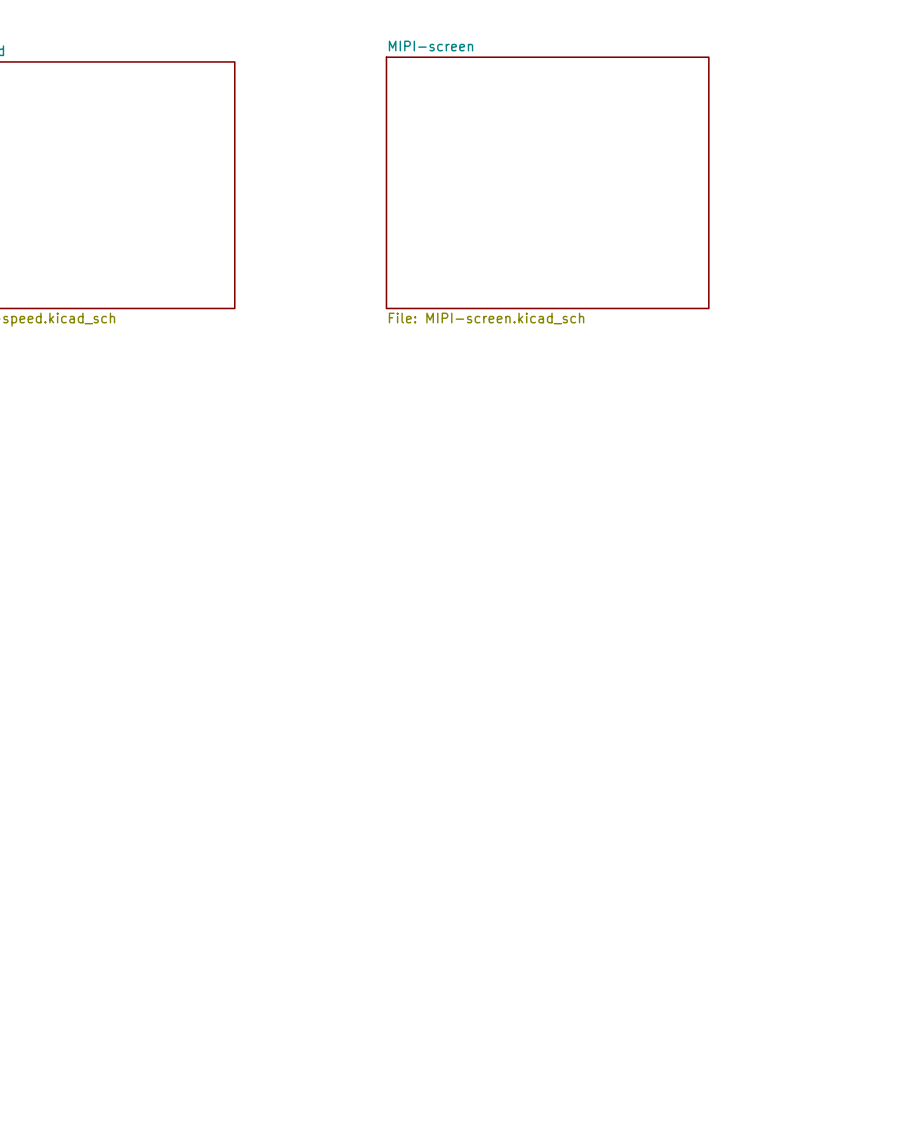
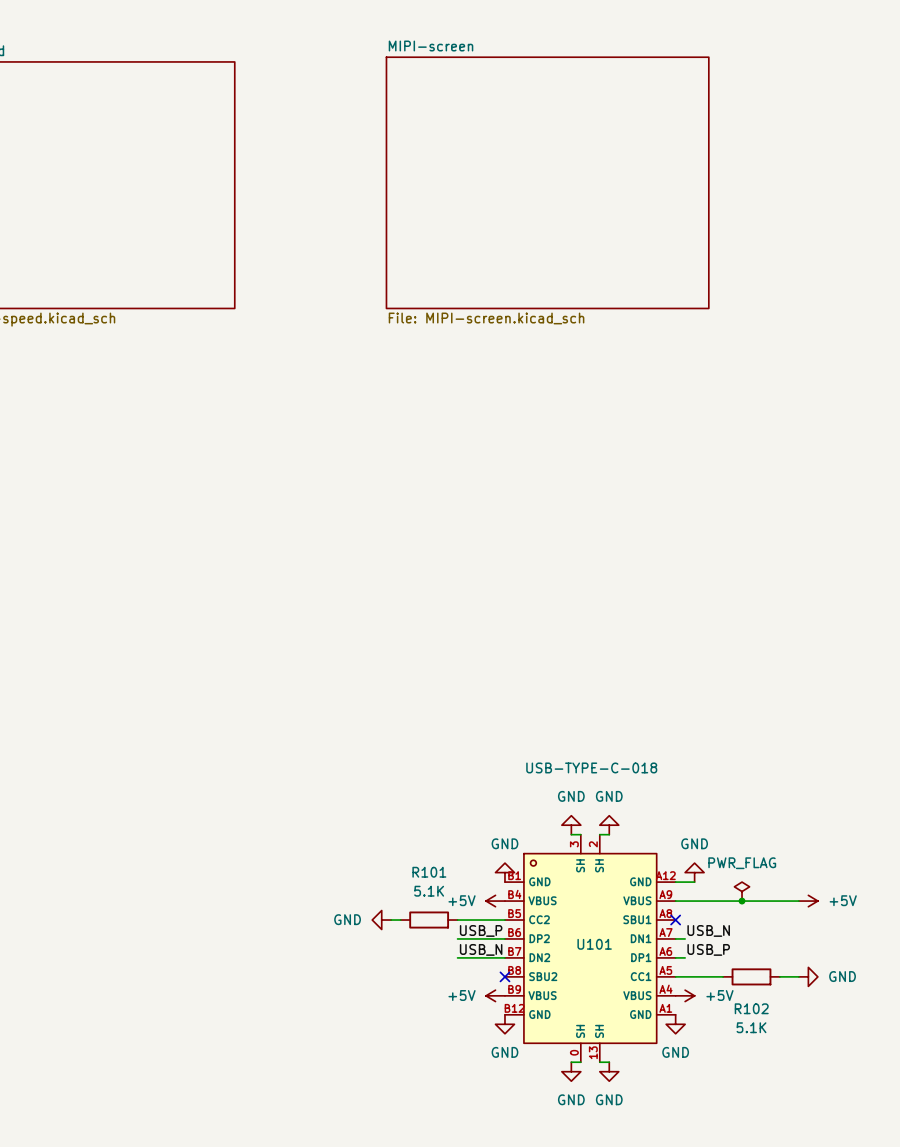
power symbol: none -> GND (571, 825)
power symbol: none -> GND (609, 825)
wire: none -> (571, 834) (580, 834)
wire: none -> (599, 834) (609, 834)
power symbol: none -> GND (504, 872)
power symbol: none -> GND (694, 872)
wire: none -> (675, 882) (694, 882)
power symbol: none -> PWR_FLAG (742, 891)
power symbol: none -> +5V (495, 901)
wire: none -> (675, 901) (798, 901)
junction: none -> (742, 901)
power symbol: none -> +5V (808, 901)
power symbol: none -> GND (381, 920)
wire: none -> (391, 920) (400, 920)
R101: none -> 5.1K (429, 920)
wire: none -> (457, 920) (504, 920)
no-connect mark: none -> (675, 920)
label: none -> USB_P (481, 930)
label: none -> USB_N (708, 930)
wire: none -> (457, 938) (504, 938)
wire: none -> (675, 938) (685, 938)
U101: none -> USB-TYPE-C-018 (590, 948)
label: none -> USB_N (481, 949)
label: none -> USB_P (708, 949)
wire: none -> (457, 957) (504, 957)
wire: none -> (675, 957) (685, 957)
no-connect mark: none -> (504, 976)
wire: none -> (675, 976) (723, 976)
R102: none -> 5.1K (751, 976)
wire: none -> (779, 976) (798, 976)
power symbol: none -> GND (808, 976)
power symbol: none -> +5V (495, 995)
power symbol: none -> +5V (685, 995)
power symbol: none -> GND (504, 1024)
power symbol: none -> GND (675, 1024)
wire: none -> (571, 1062) (580, 1062)
wire: none -> (599, 1062) (609, 1062)
power symbol: none -> GND (571, 1071)
power symbol: none -> GND (609, 1071)

